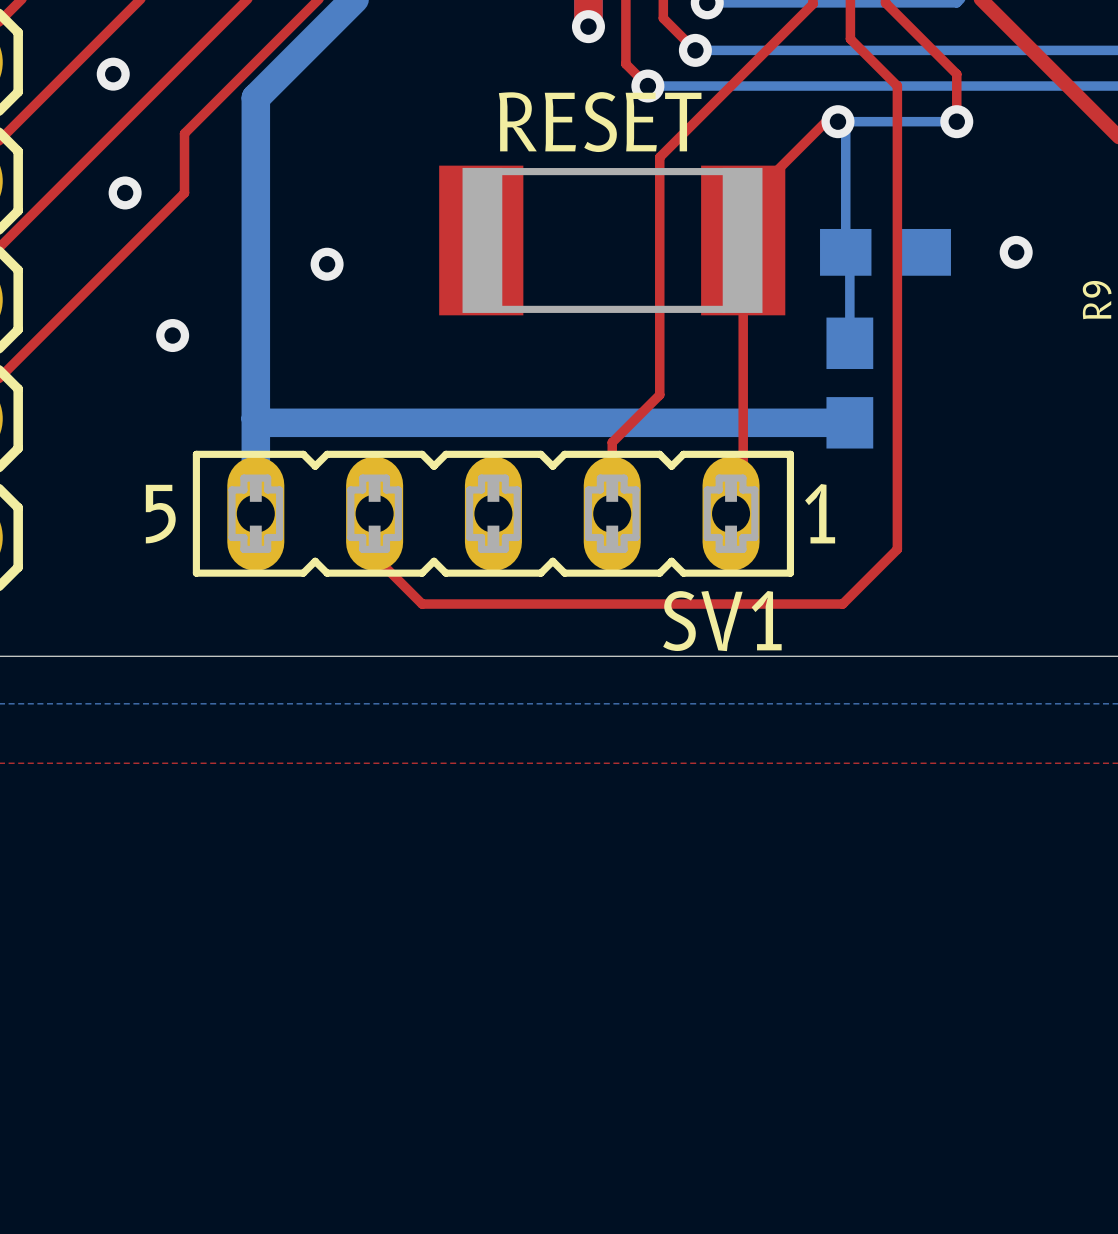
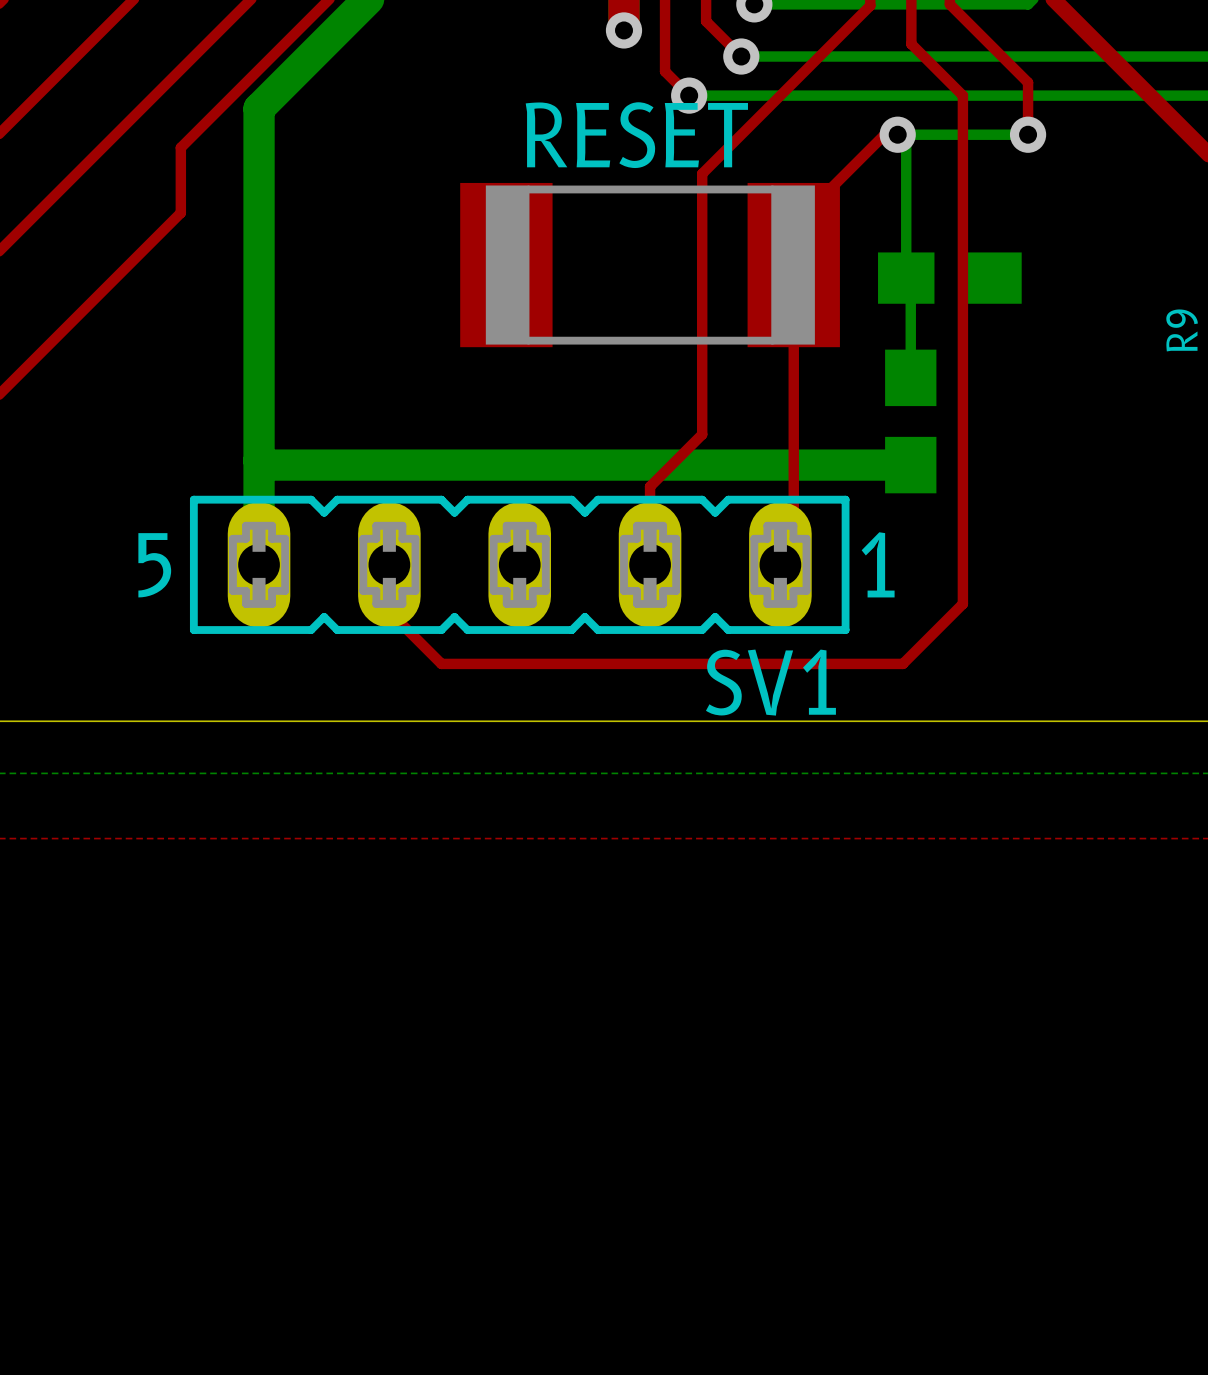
via: (113, 74) -> none
via: (125, 192) -> none
via: (1016, 252) -> none
via: (327, 264) -> none
via: (172, 335) -> none

